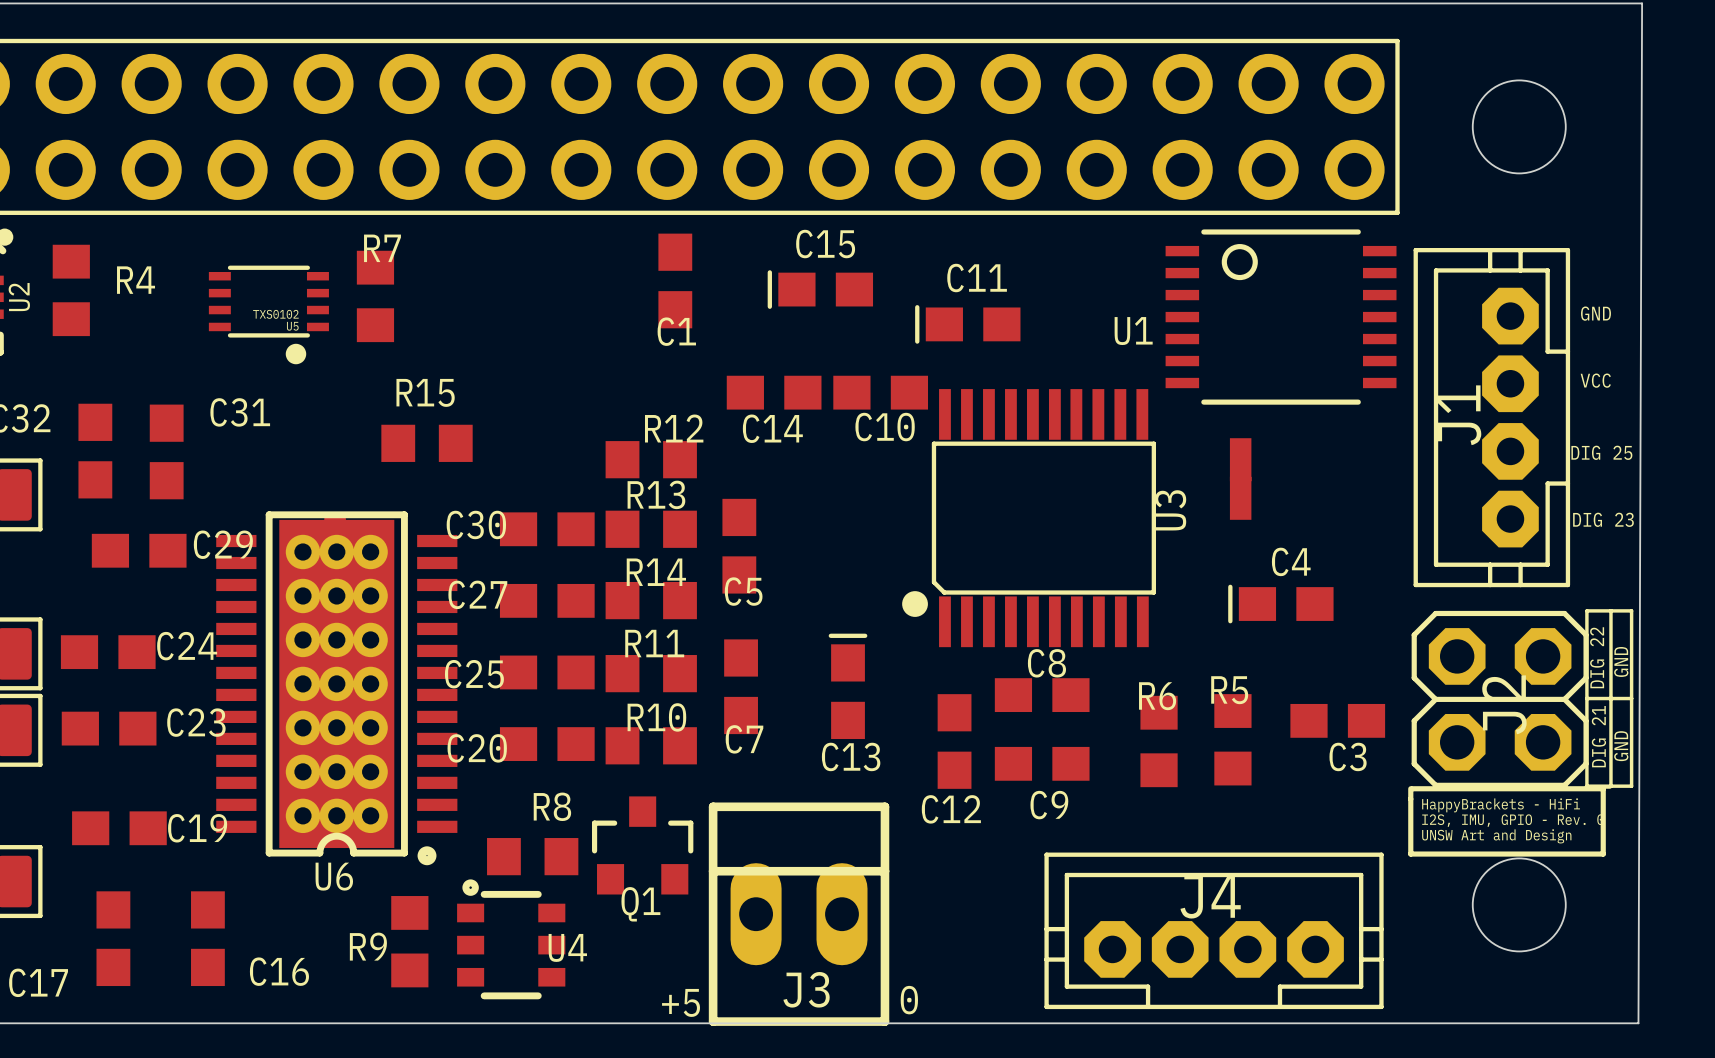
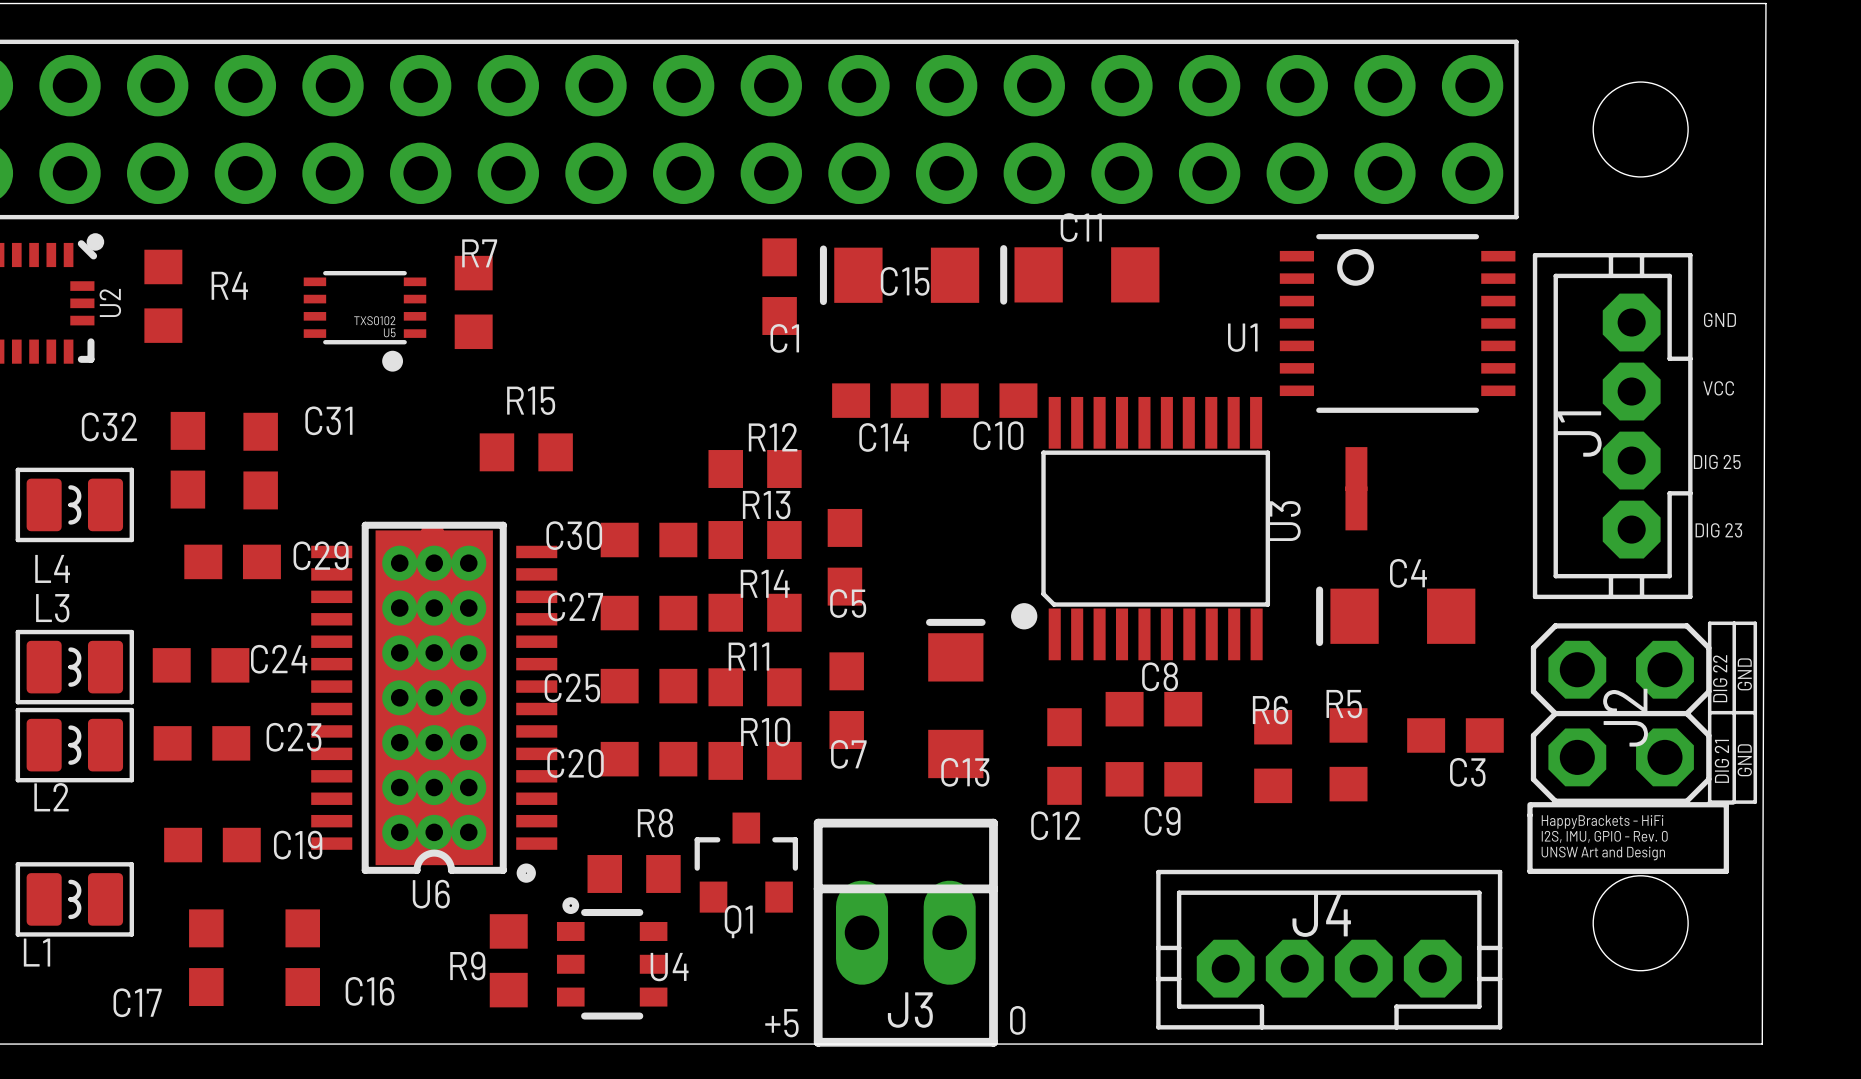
C15 footprint: [767, 270, 874, 309] -> [819, 245, 980, 306]
C11 footprint: [915, 305, 1021, 344] -> [1000, 245, 1160, 305]
C4 footprint: [1228, 584, 1334, 624] -> [1316, 586, 1476, 647]
C13 footprint: [828, 633, 868, 740] -> [926, 618, 986, 779]

